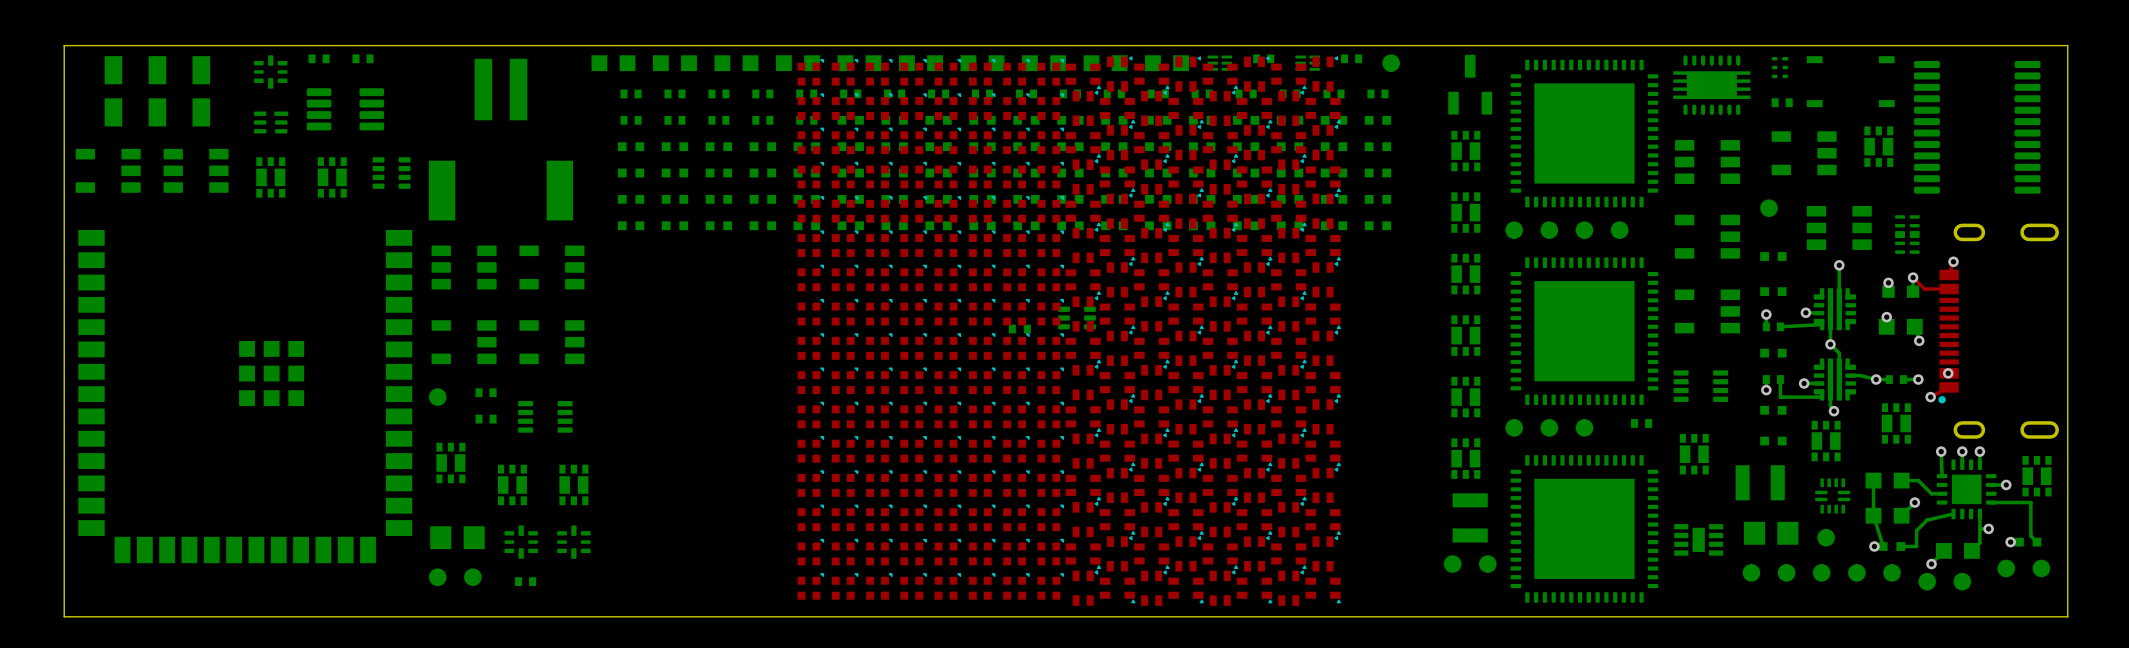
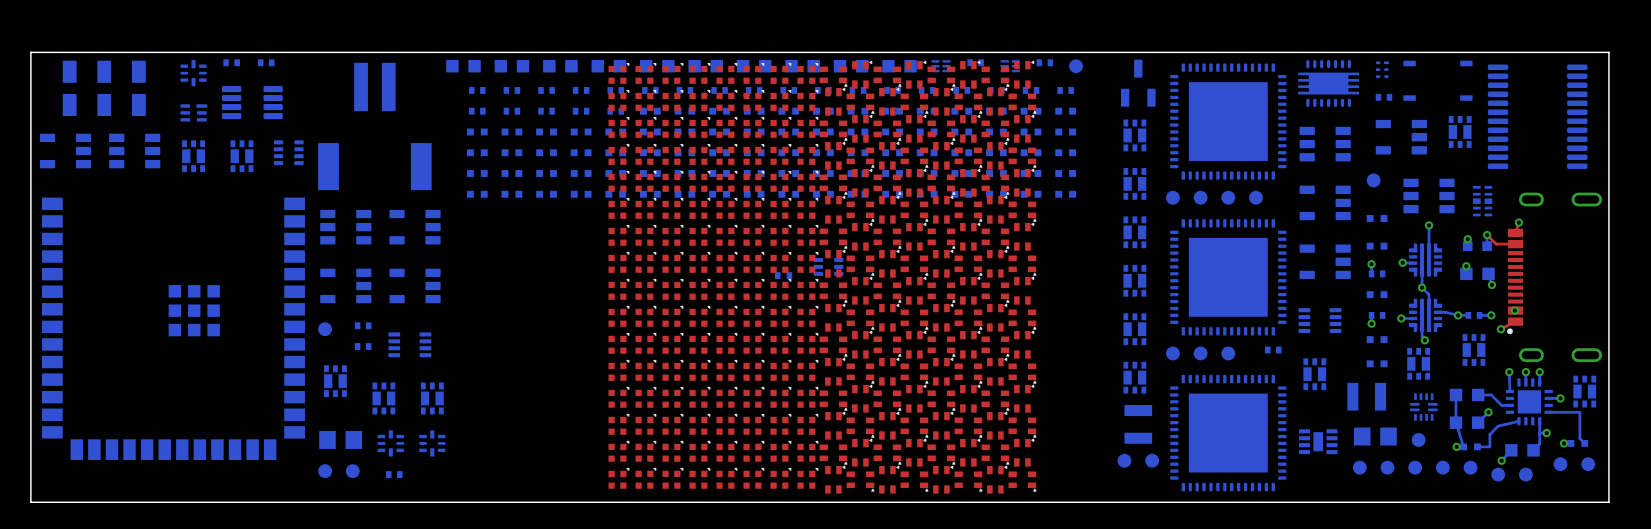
bottom track: (1822, 324) (1780, 326) -> none
bottom track: (1780, 379) (1780, 397) (1822, 397) (1822, 394) -> none

